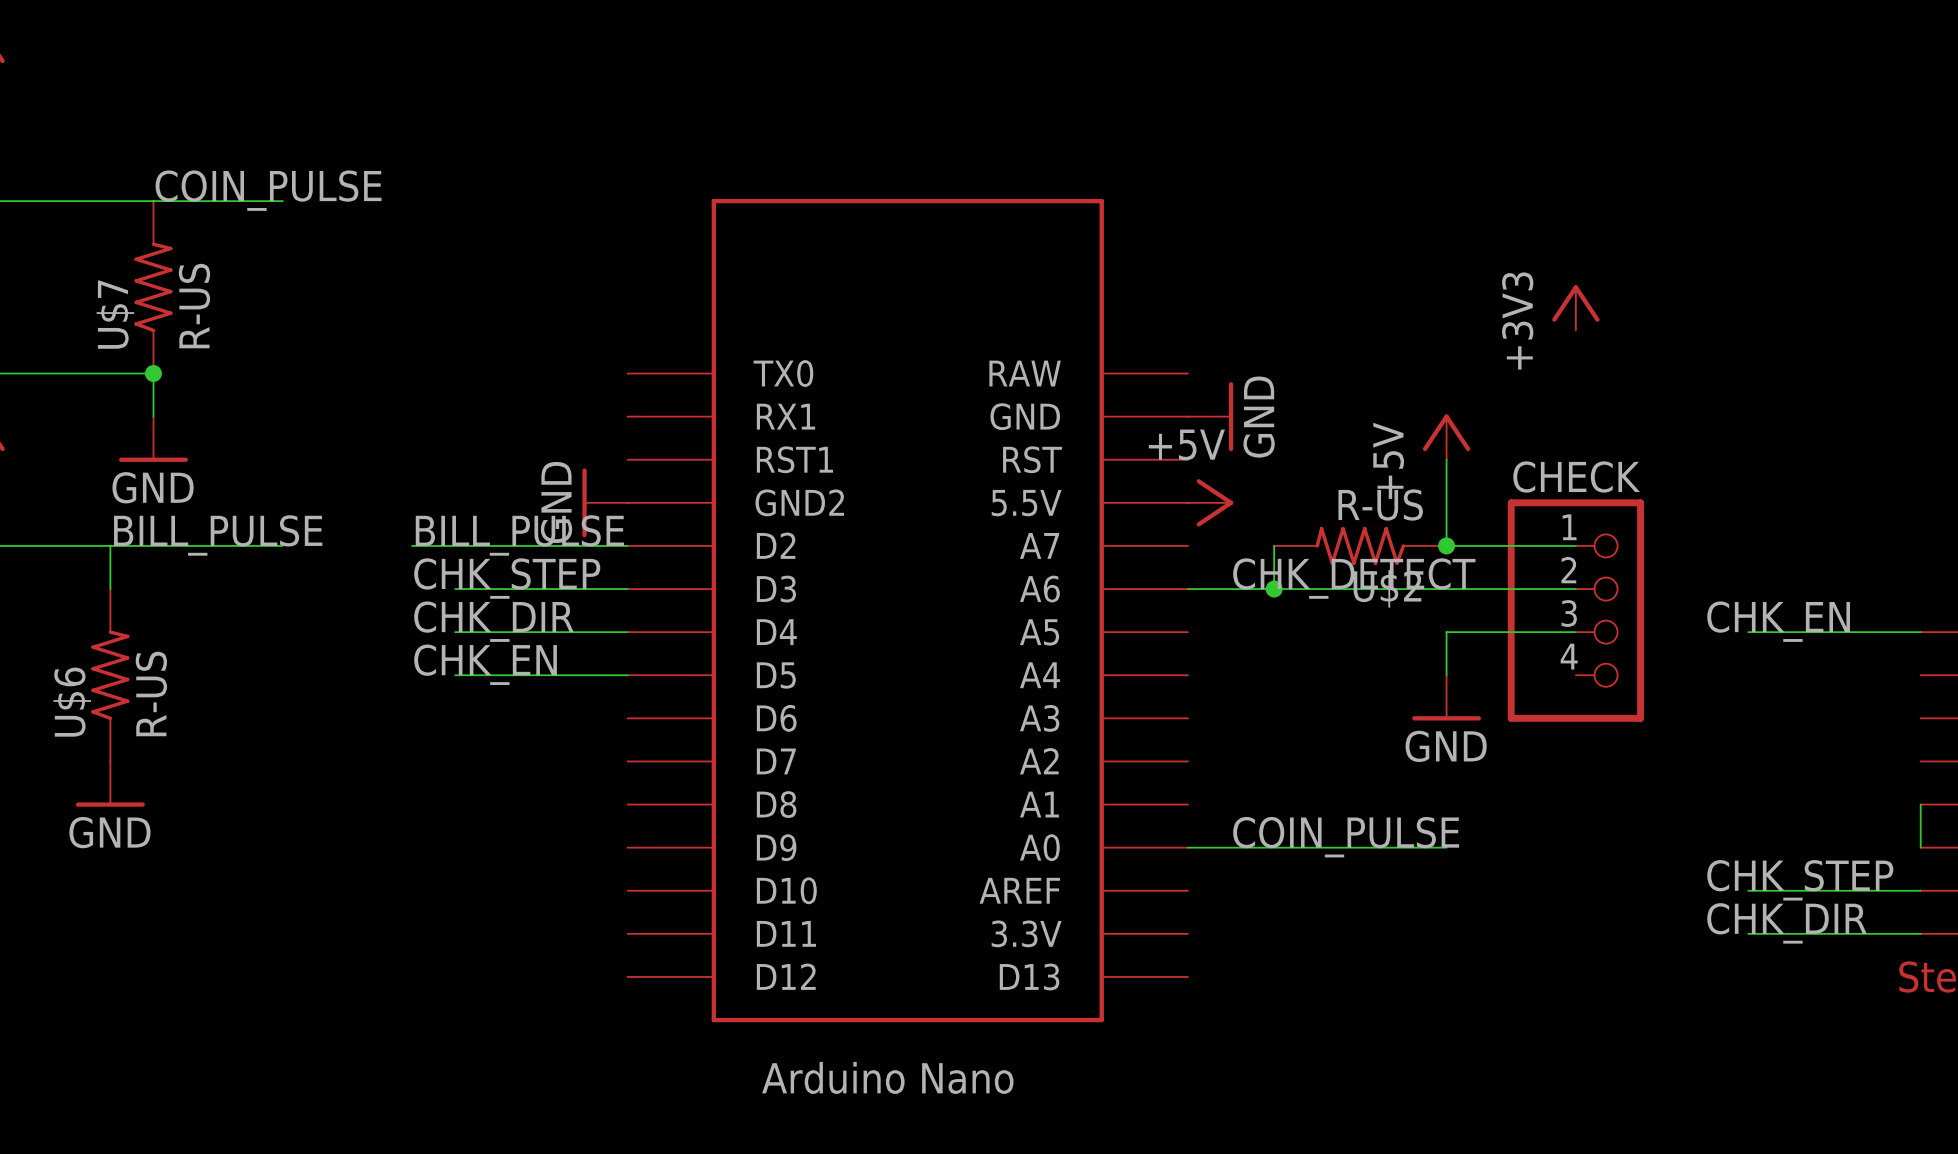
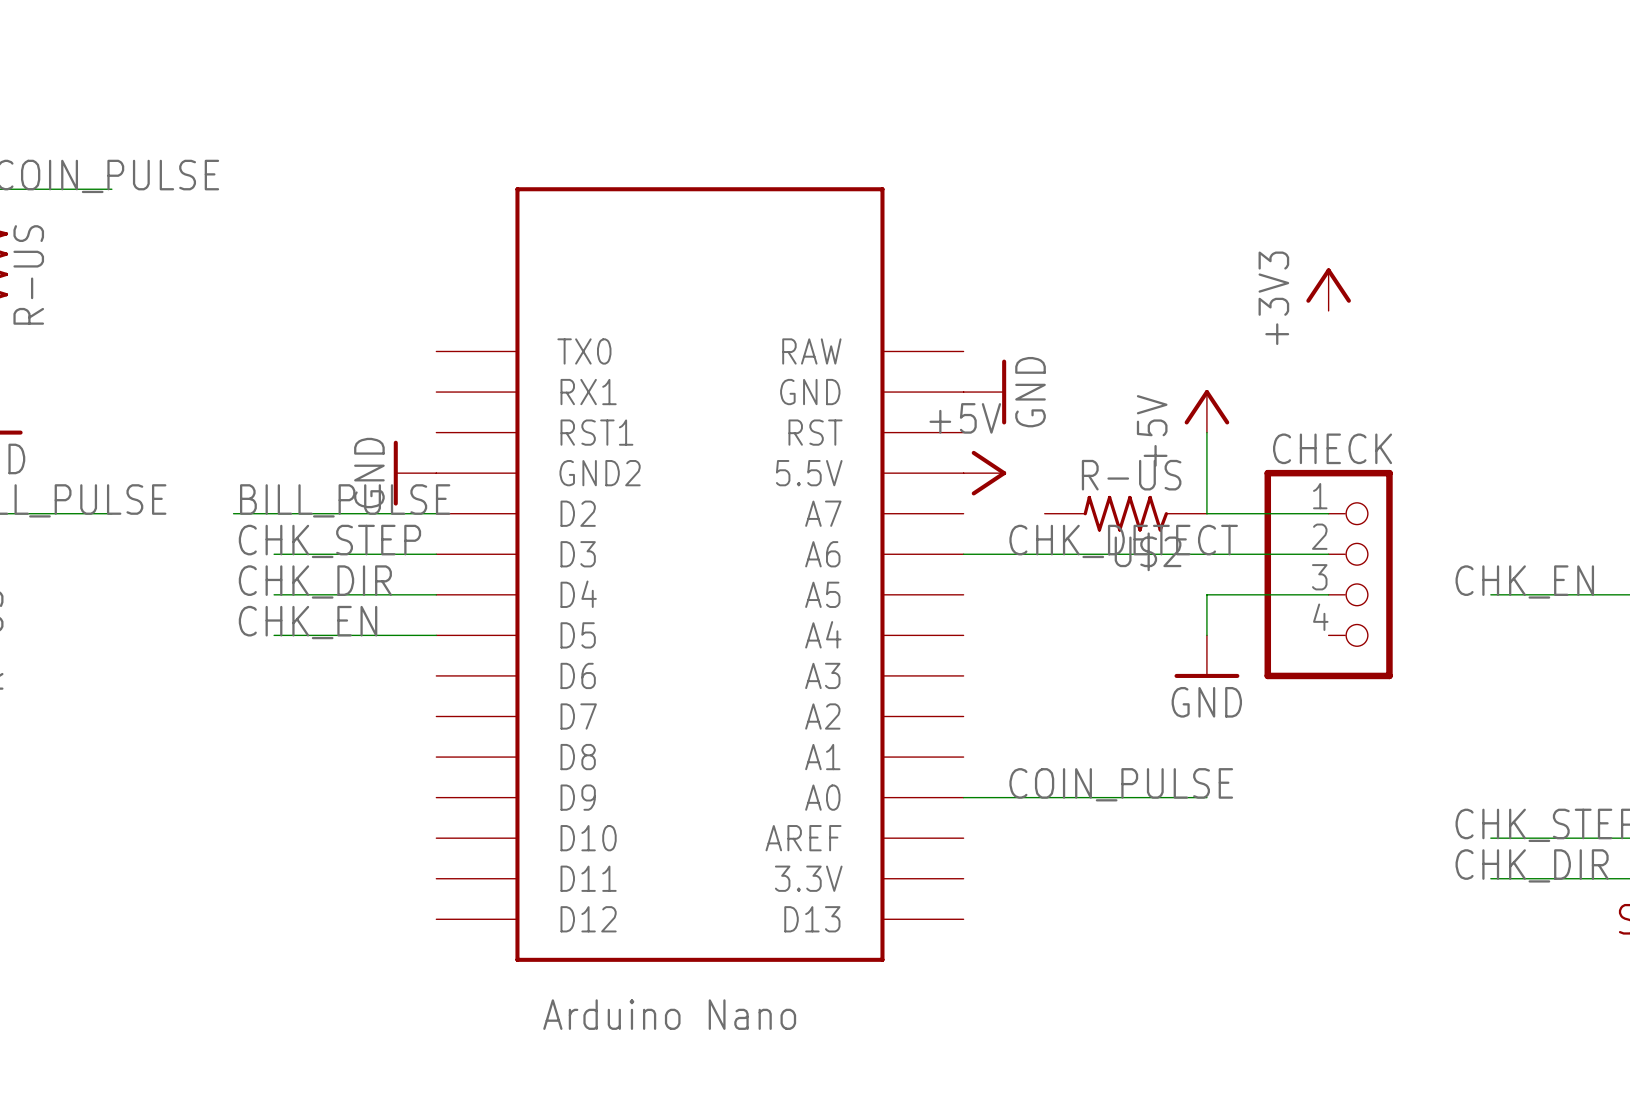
wire: (1274, 545) (1274, 589) -> none
junction: (1446, 545) -> none
junction: (1274, 589) -> none

